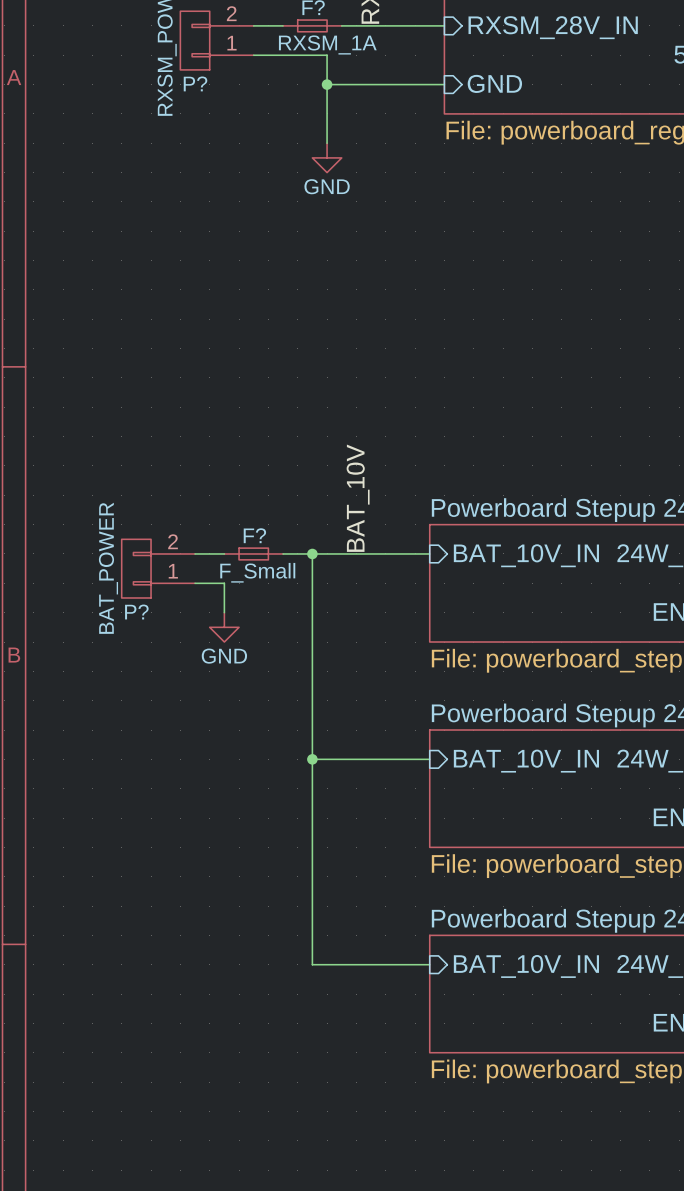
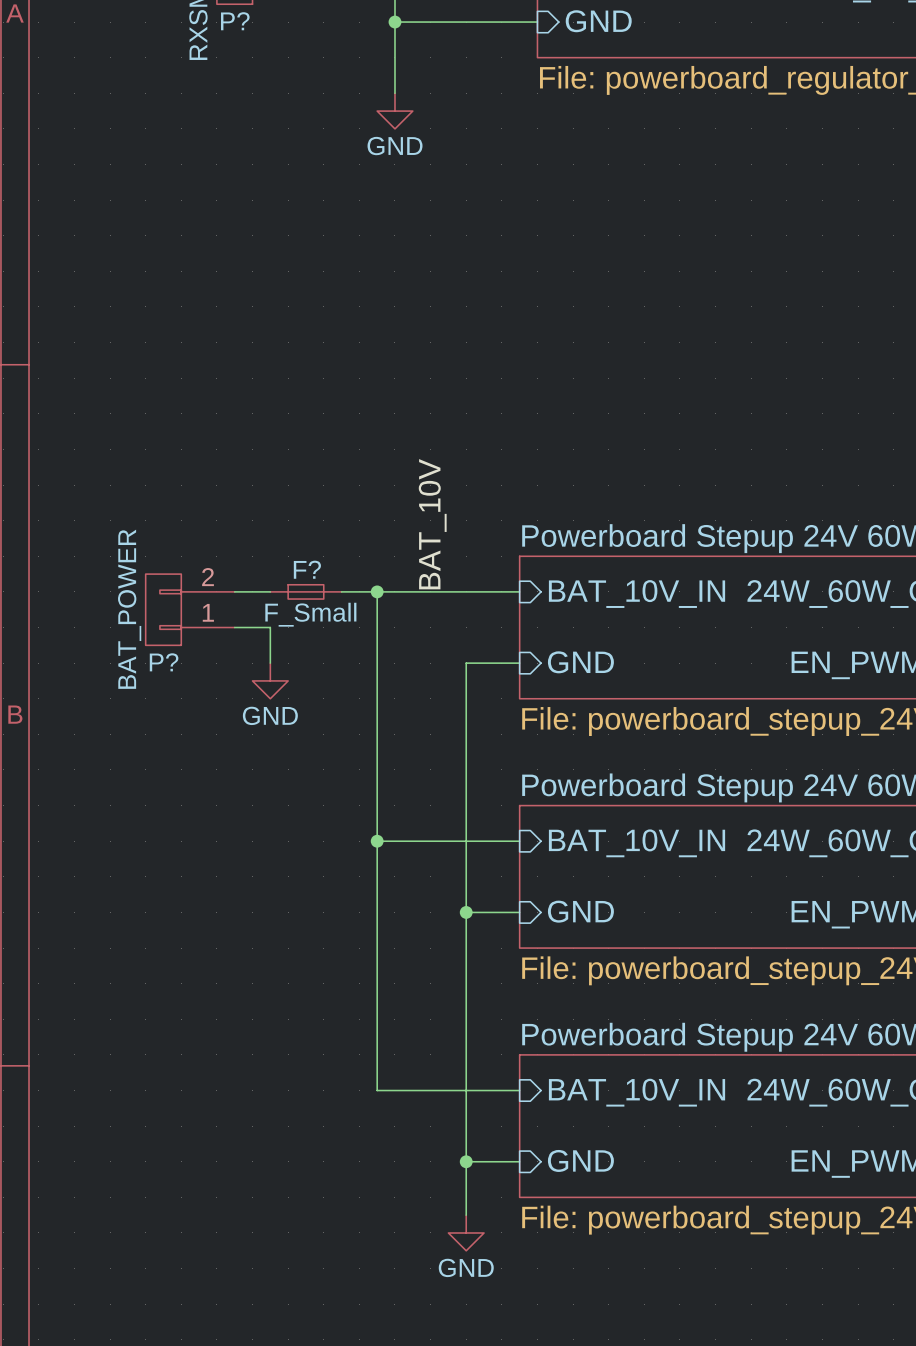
wire: none -> (519, 663) (466, 663) (466, 1215)
sheet pin: none -> GND (580, 662)
sheet pin: none -> GND (580, 911)
wire: none -> (466, 912) (519, 912)
junction: none -> (466, 912)
sheet pin: none -> GND (580, 1160)
wire: none -> (466, 1161) (519, 1161)
junction: none -> (466, 1161)
power symbol: none -> GND (466, 1232)

